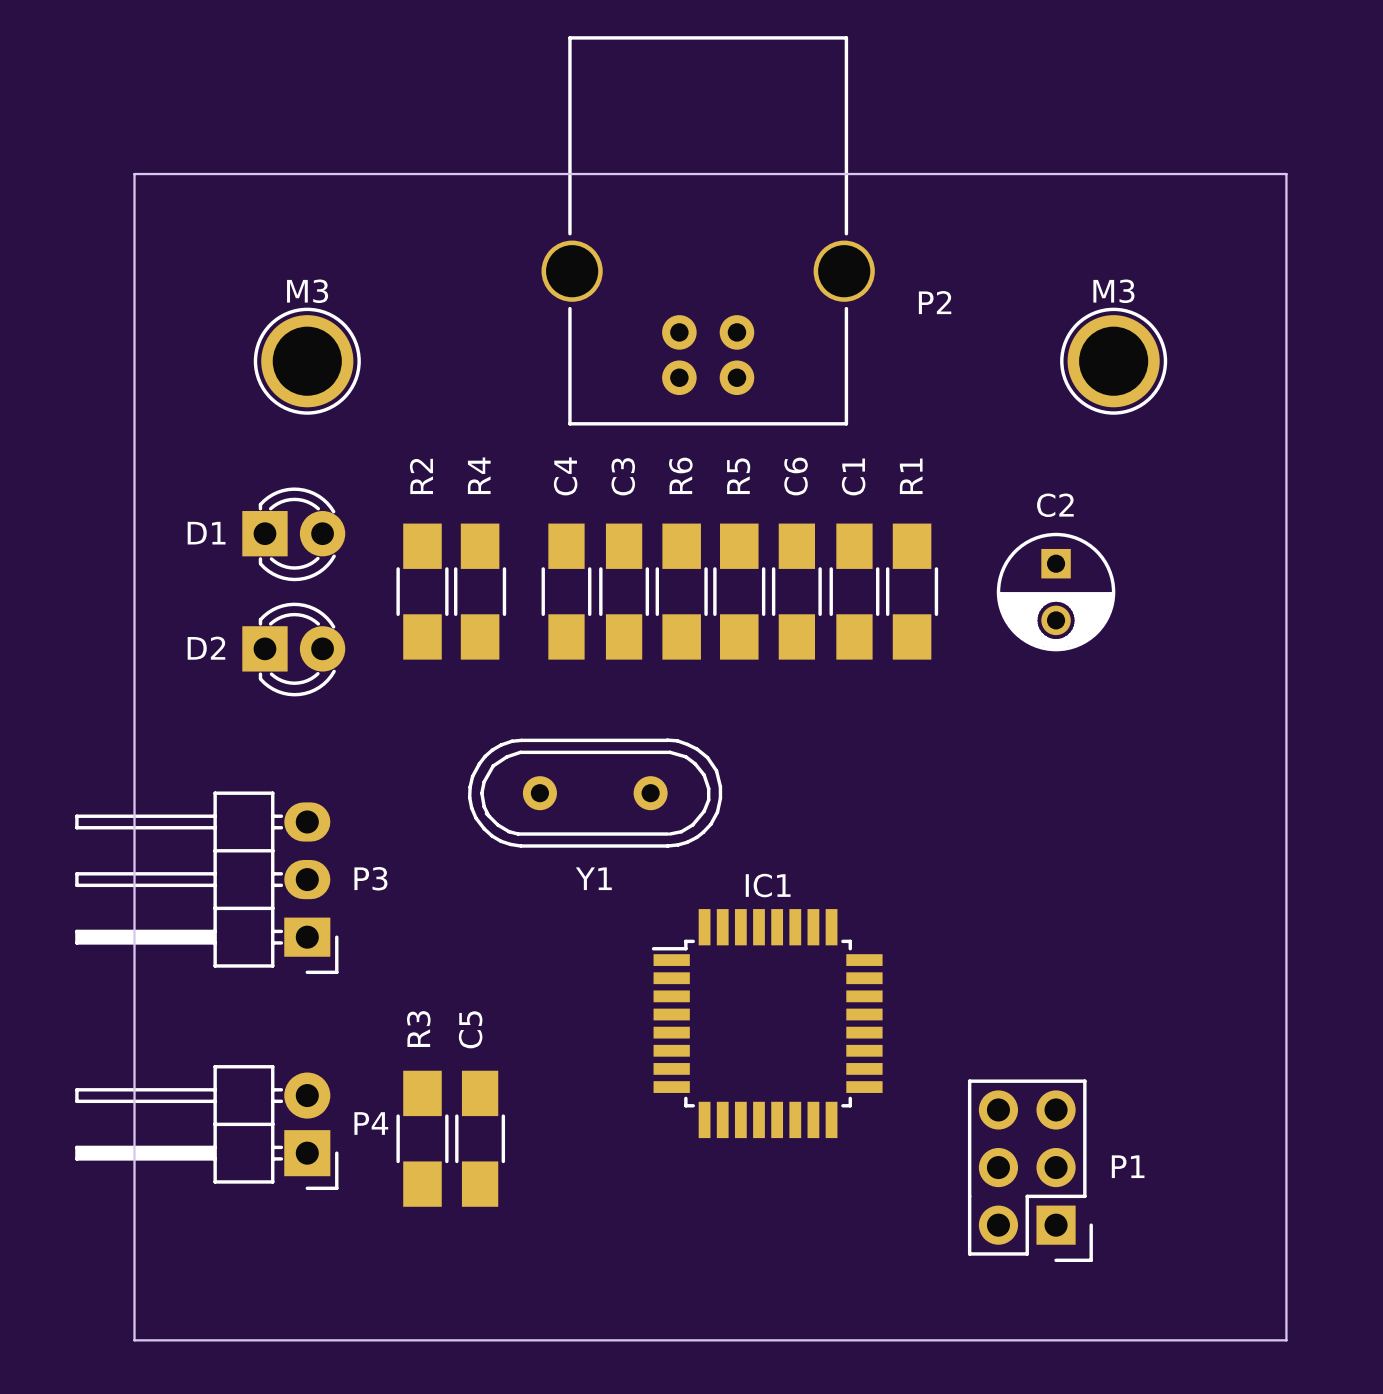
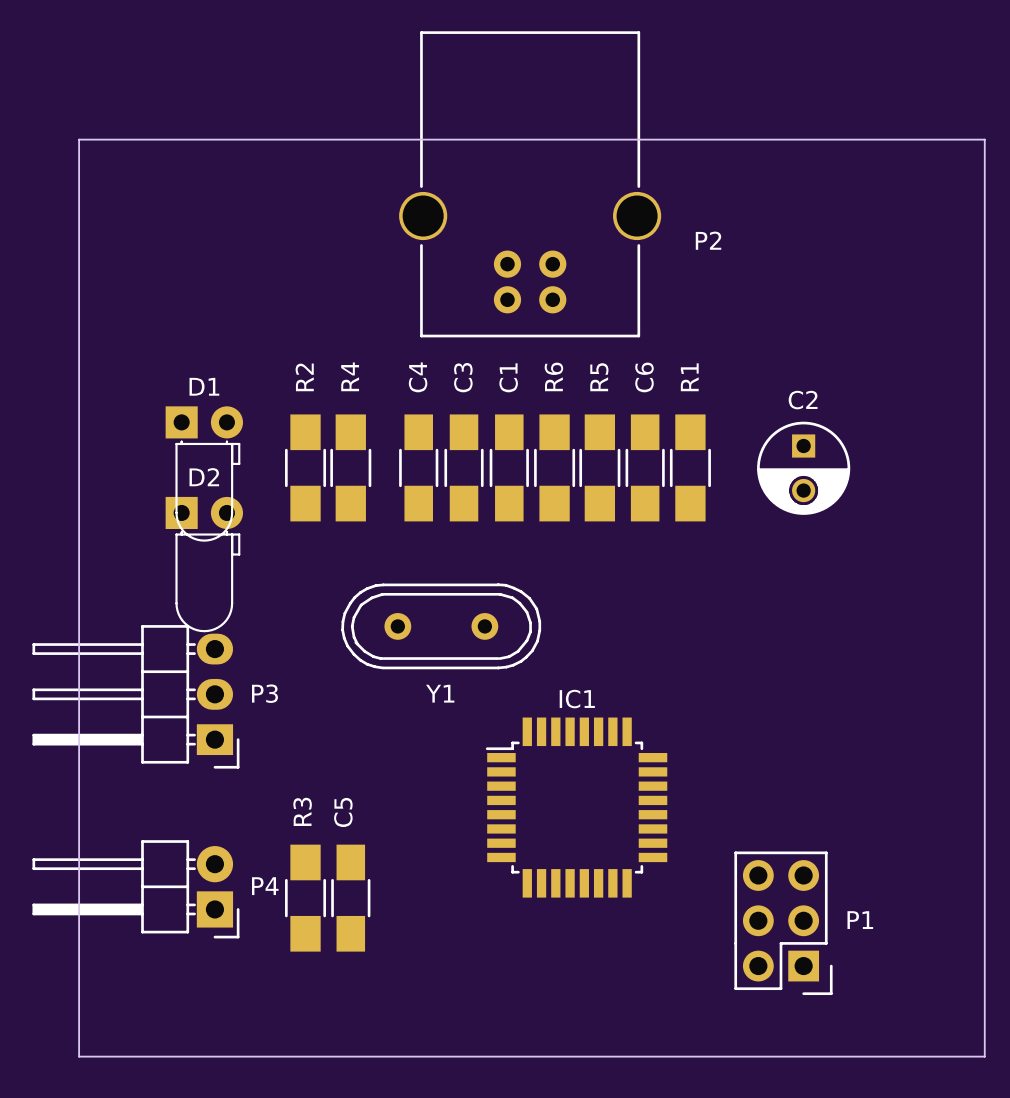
M3: (307, 361) -> none
M3: (1113, 361) -> none
R5 name: R5 (738, 476) -> R6 (553, 376)
C1 name: C1 (853, 476) -> C6 (644, 377)
D1 footprint: [242, 487, 346, 582] -> [165, 406, 244, 542]
D1 name position: D1 (206, 533) -> D1 (204, 386)
R6: (681, 591) -> none
C1: none -> (509, 467)
C6: (796, 591) -> none
R5: none -> (599, 467)
D2 footprint: [242, 602, 346, 697] -> [165, 496, 244, 633]
D2 name position: D2 (206, 648) -> D2 (204, 477)

